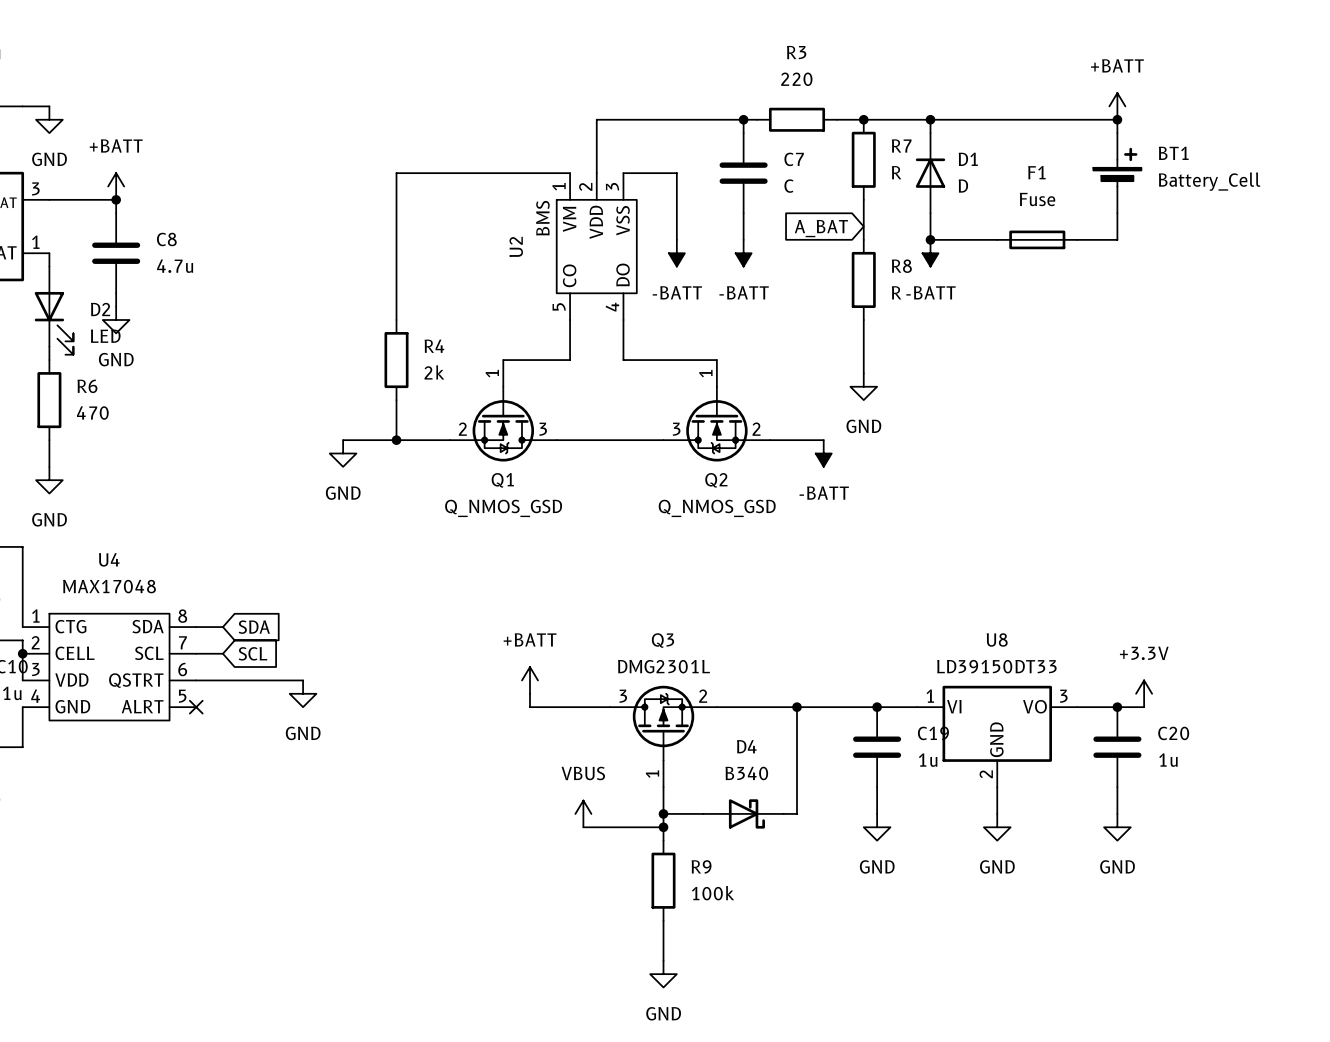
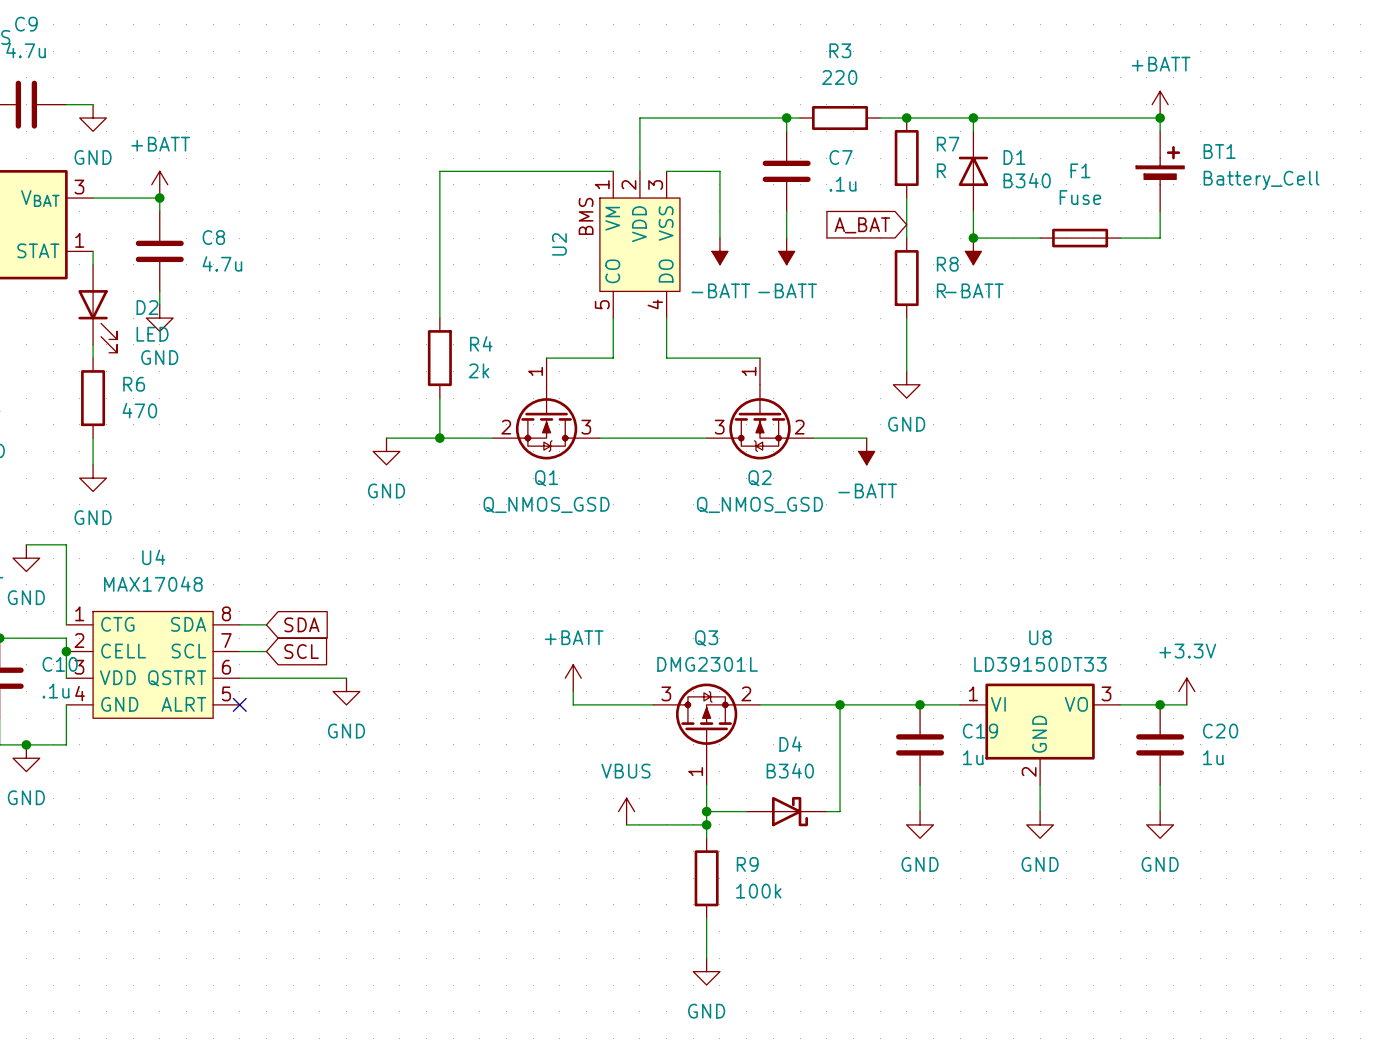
C7 value: C (788, 186) -> .1u (842, 184)
D1 value: D (963, 186) -> B340 (1027, 180)

